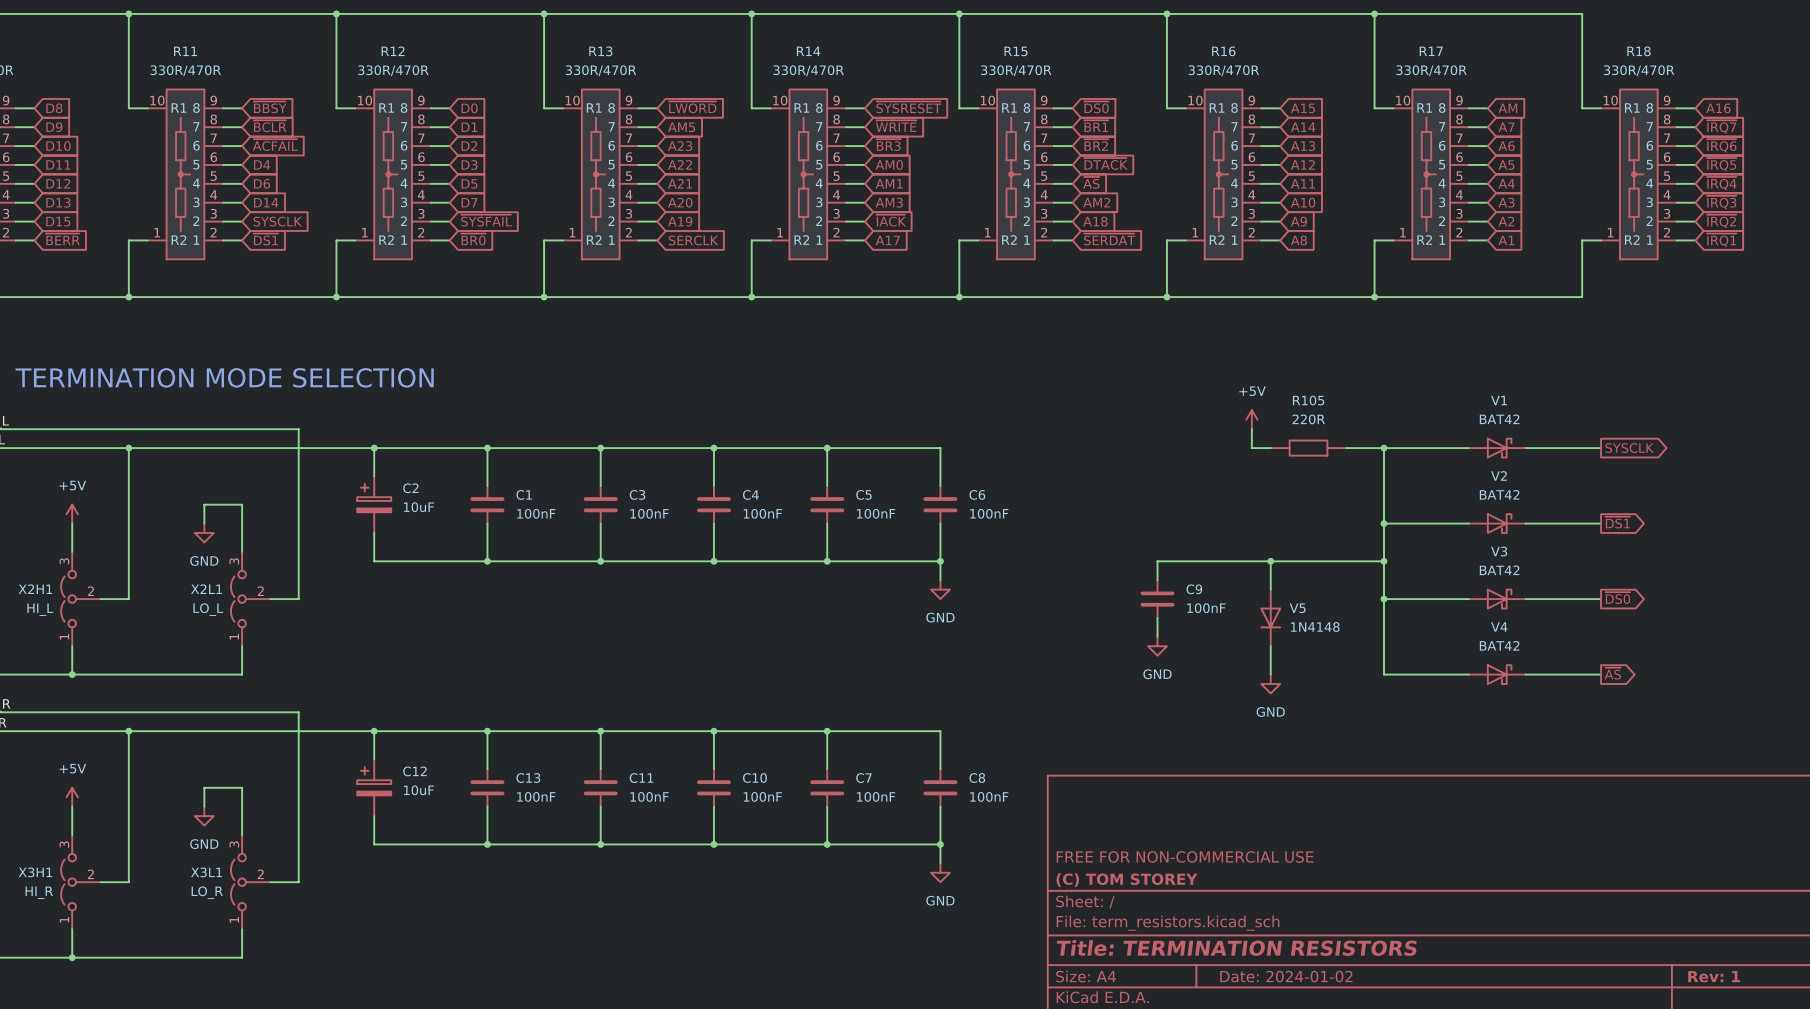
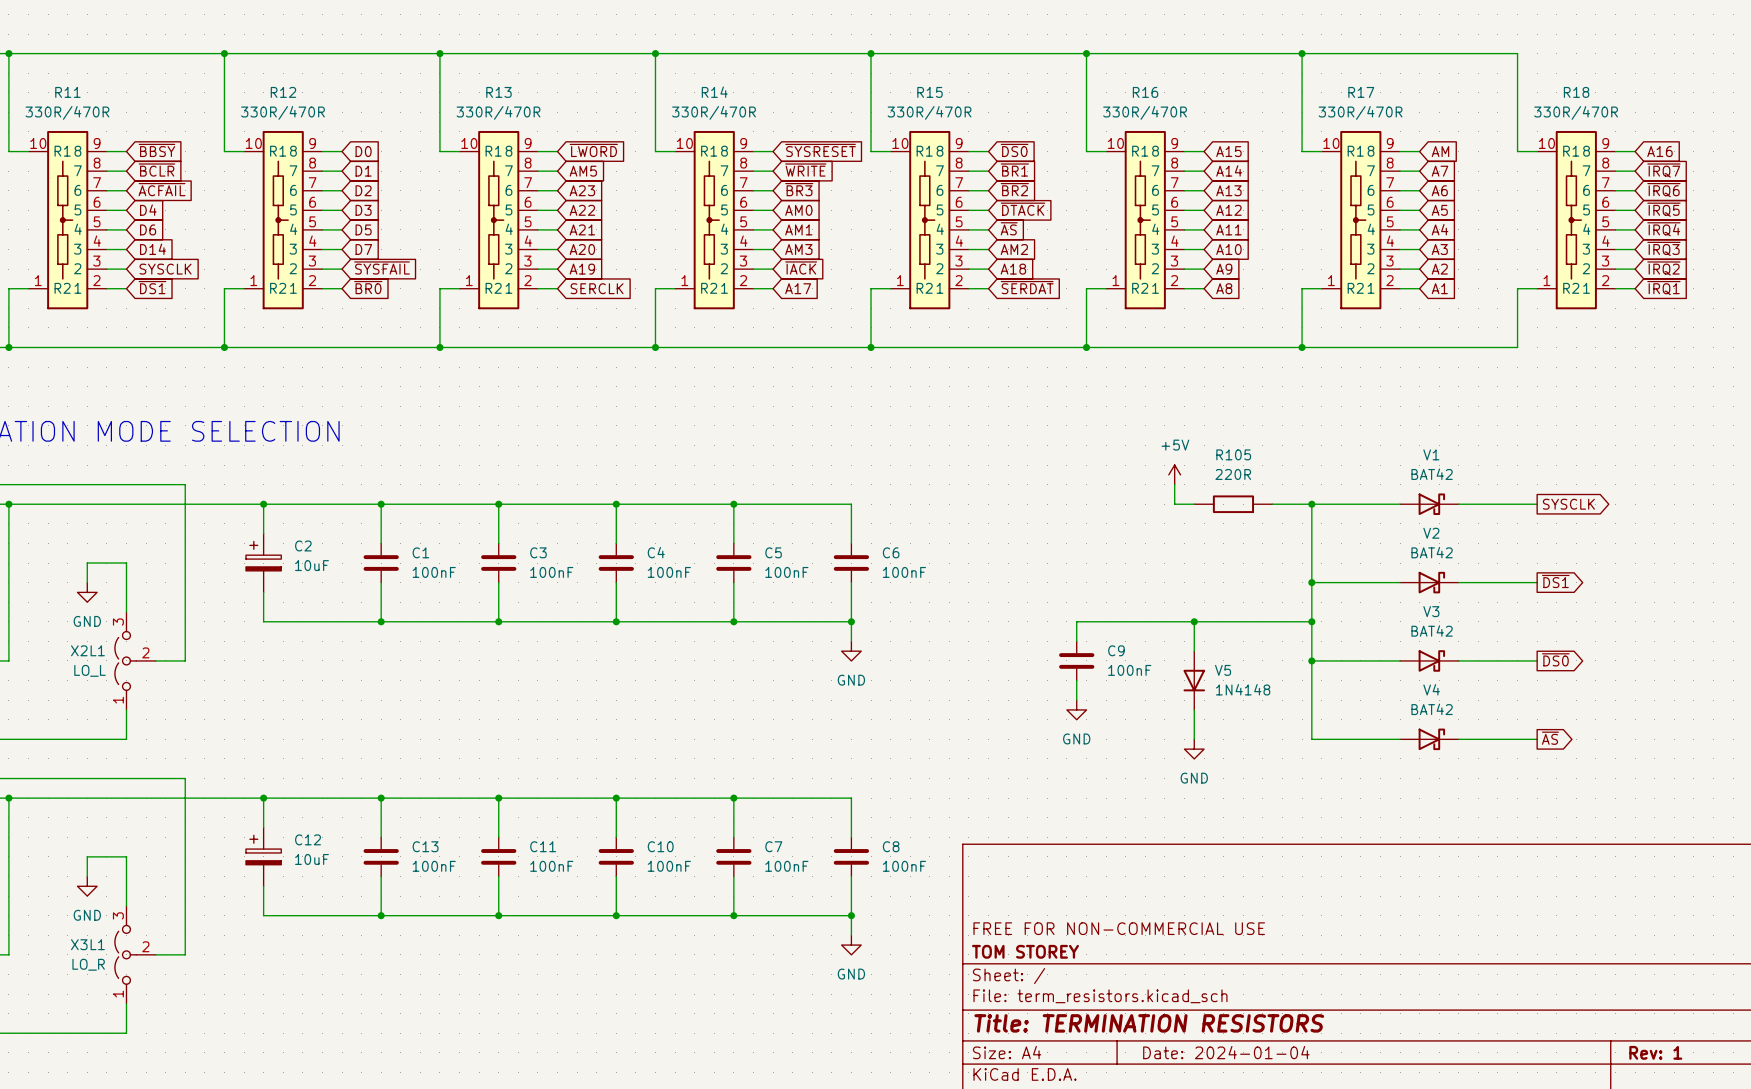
title block: (C) TOM STOREY (1127, 880) -> TOM STOREY (1025, 951)
title block: Date: 2024-01-02 (1286, 976) -> Date: 2024-01-04 (1226, 1052)

